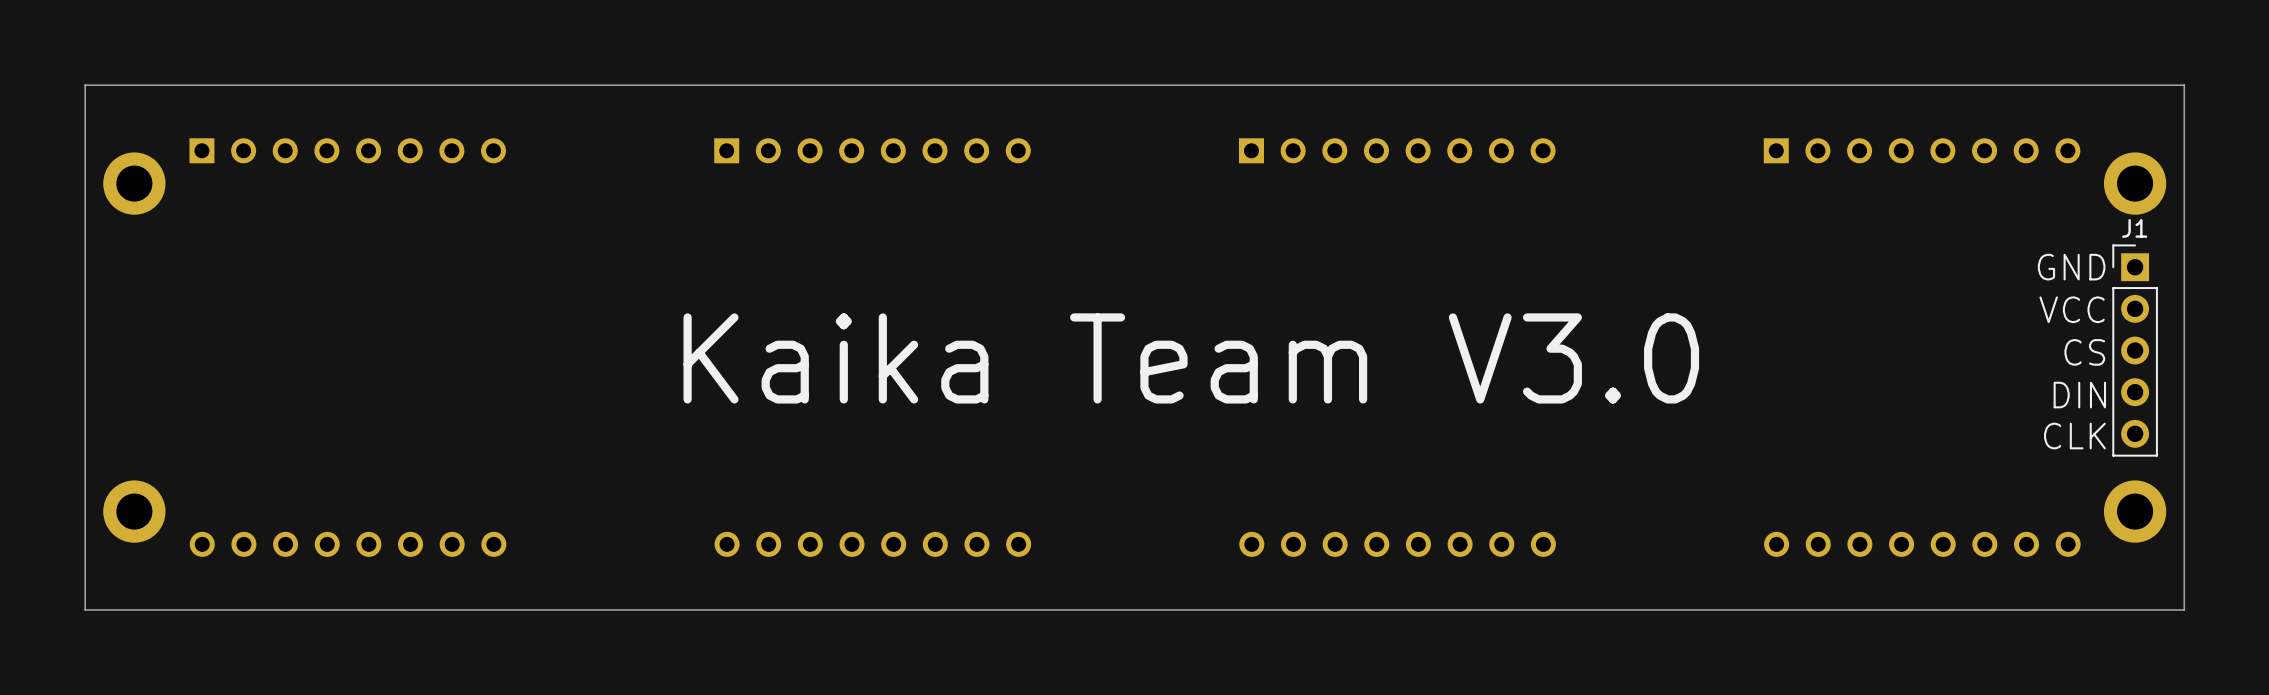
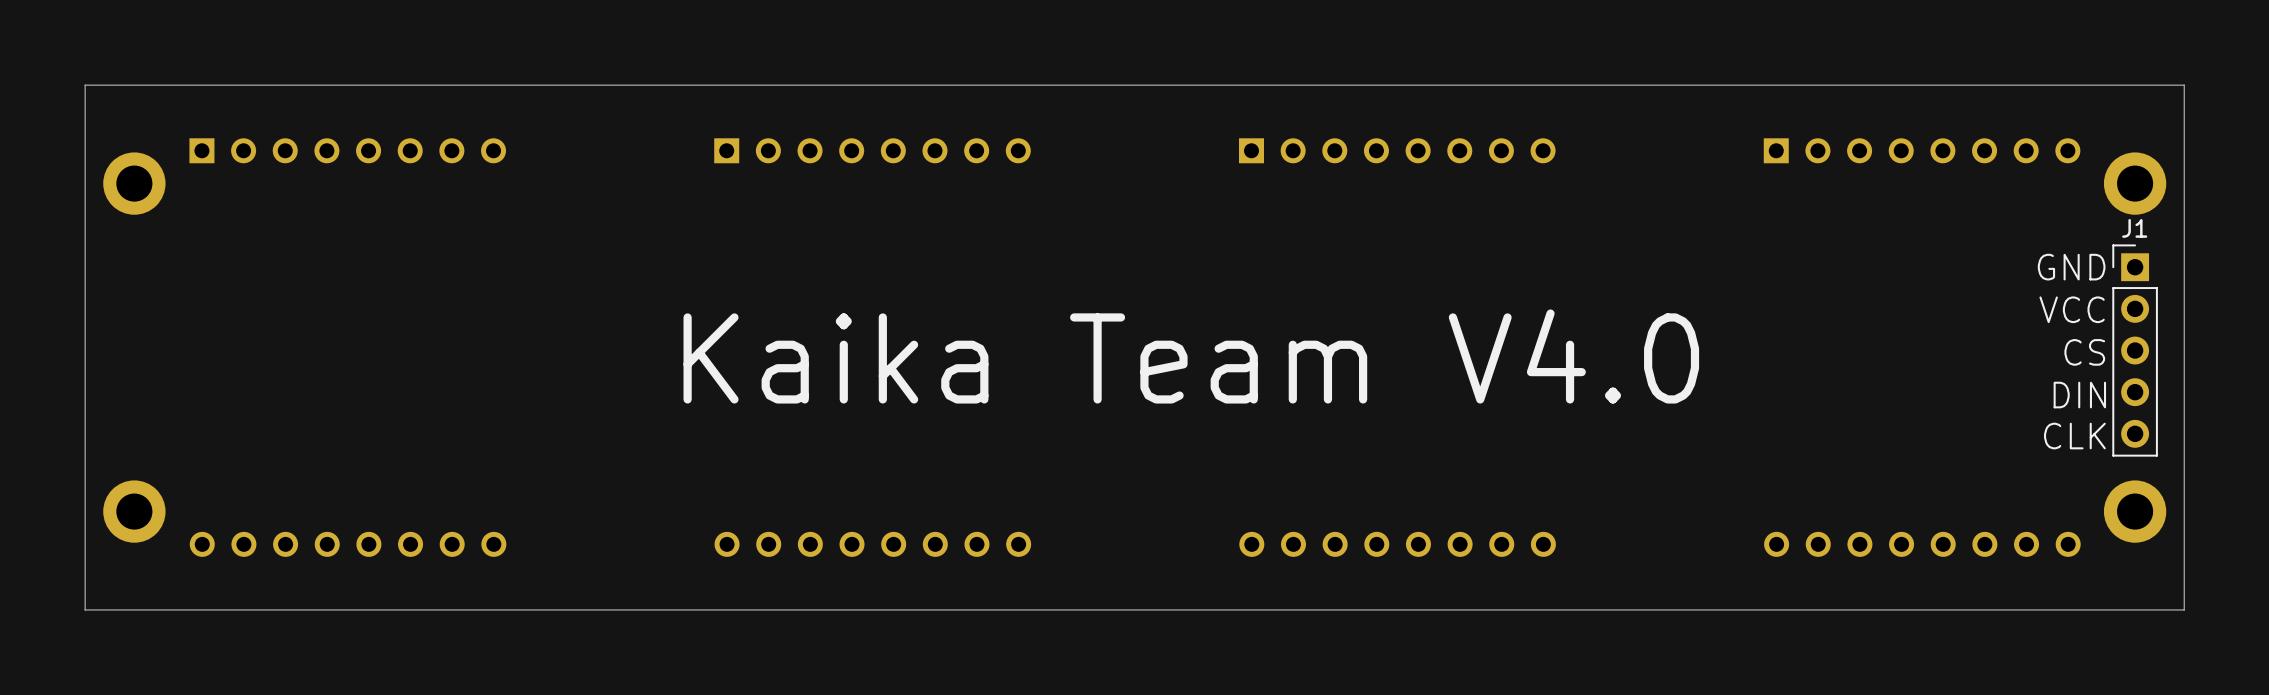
text: Kaika Team V3.0 (1191, 358) -> Kaika Team V4.0 (1191, 356)

